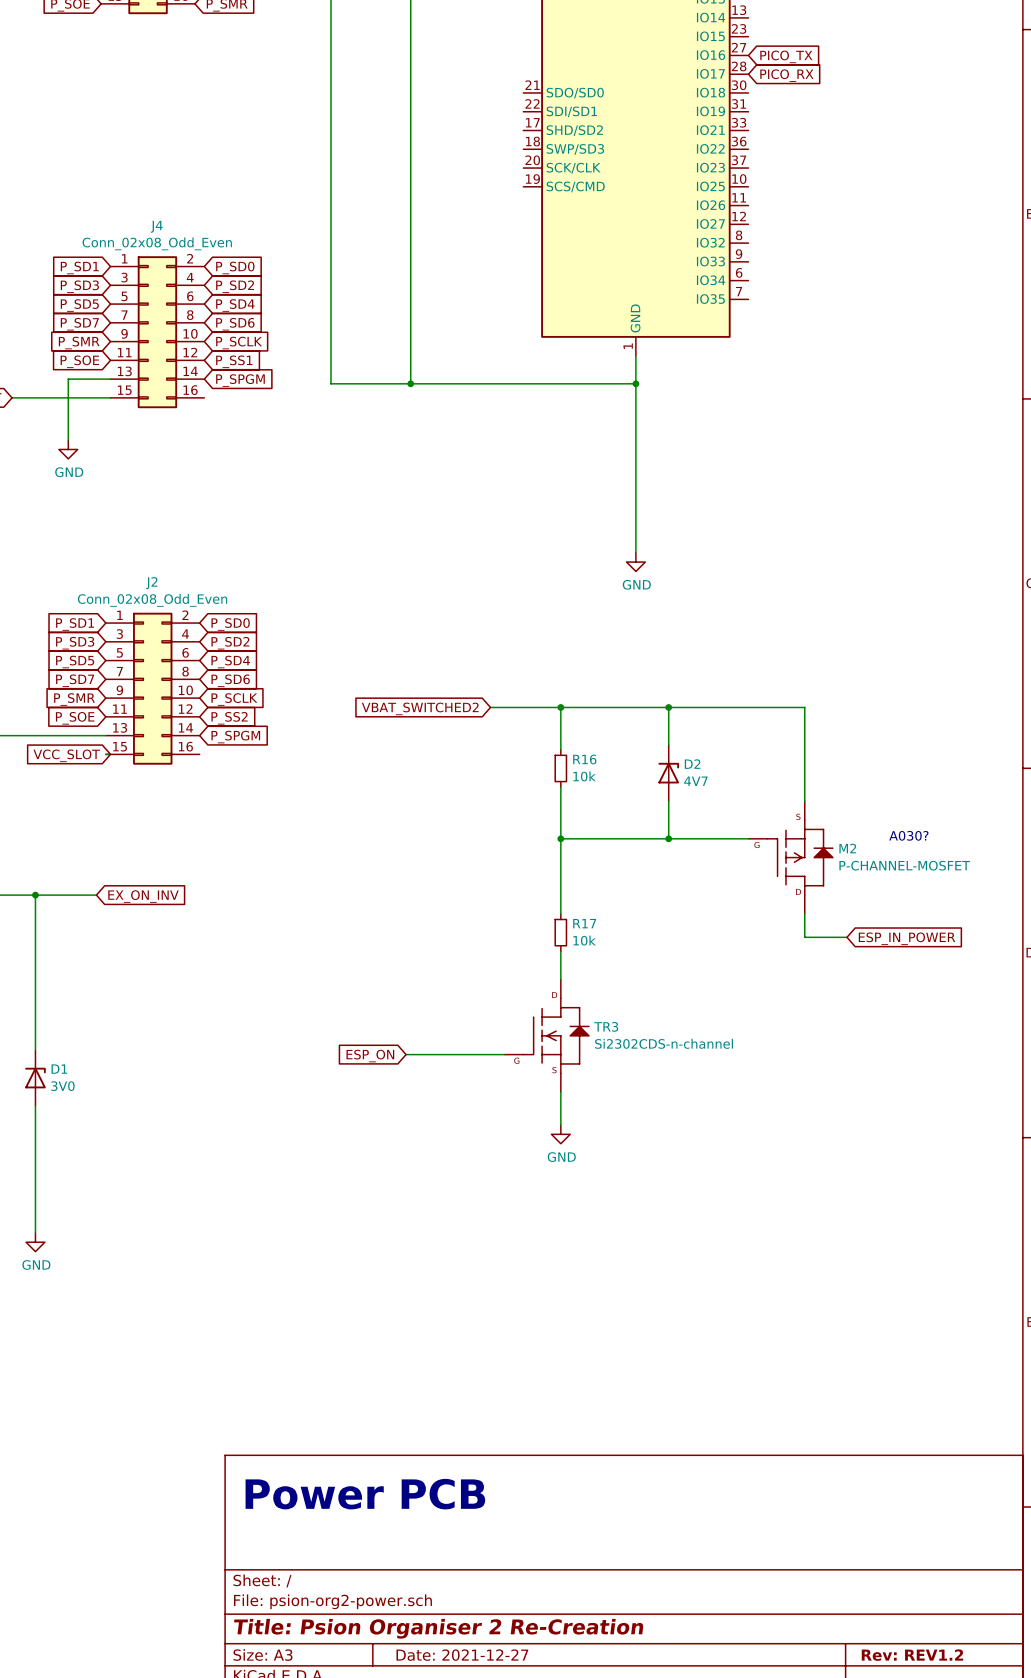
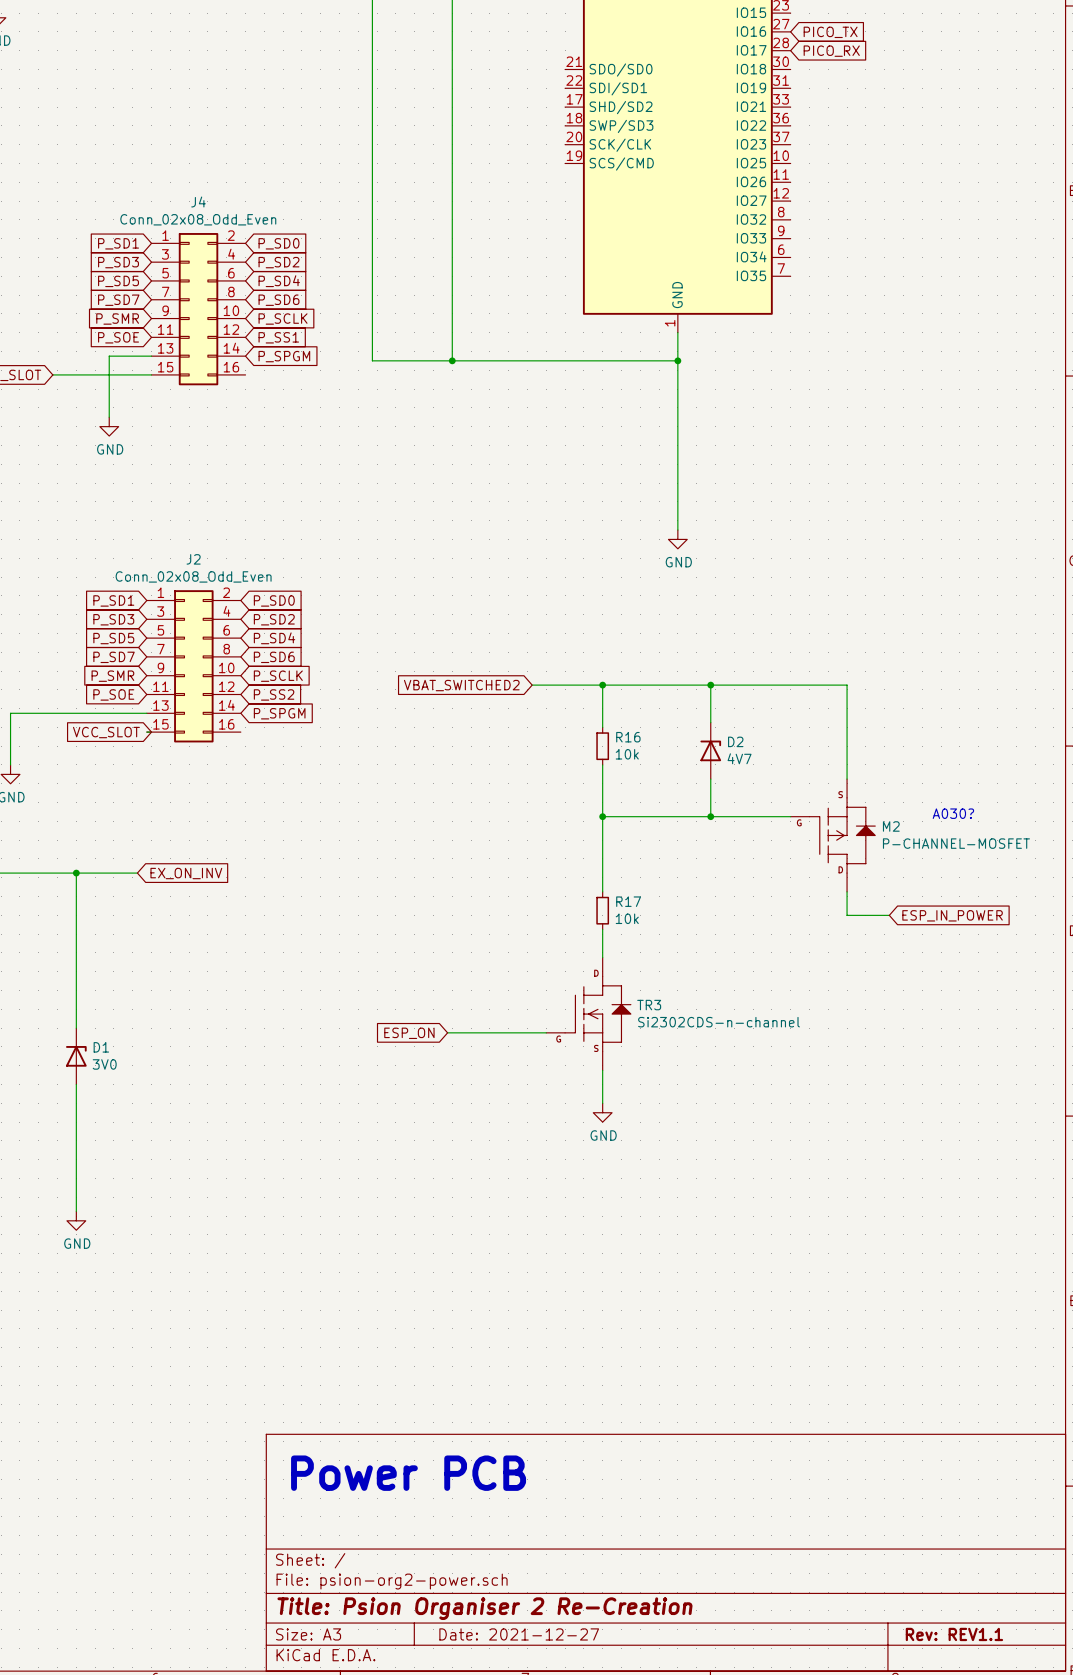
title block: Rev: REV1.2 (912, 1655) -> Rev: REV1.1 (954, 1634)

